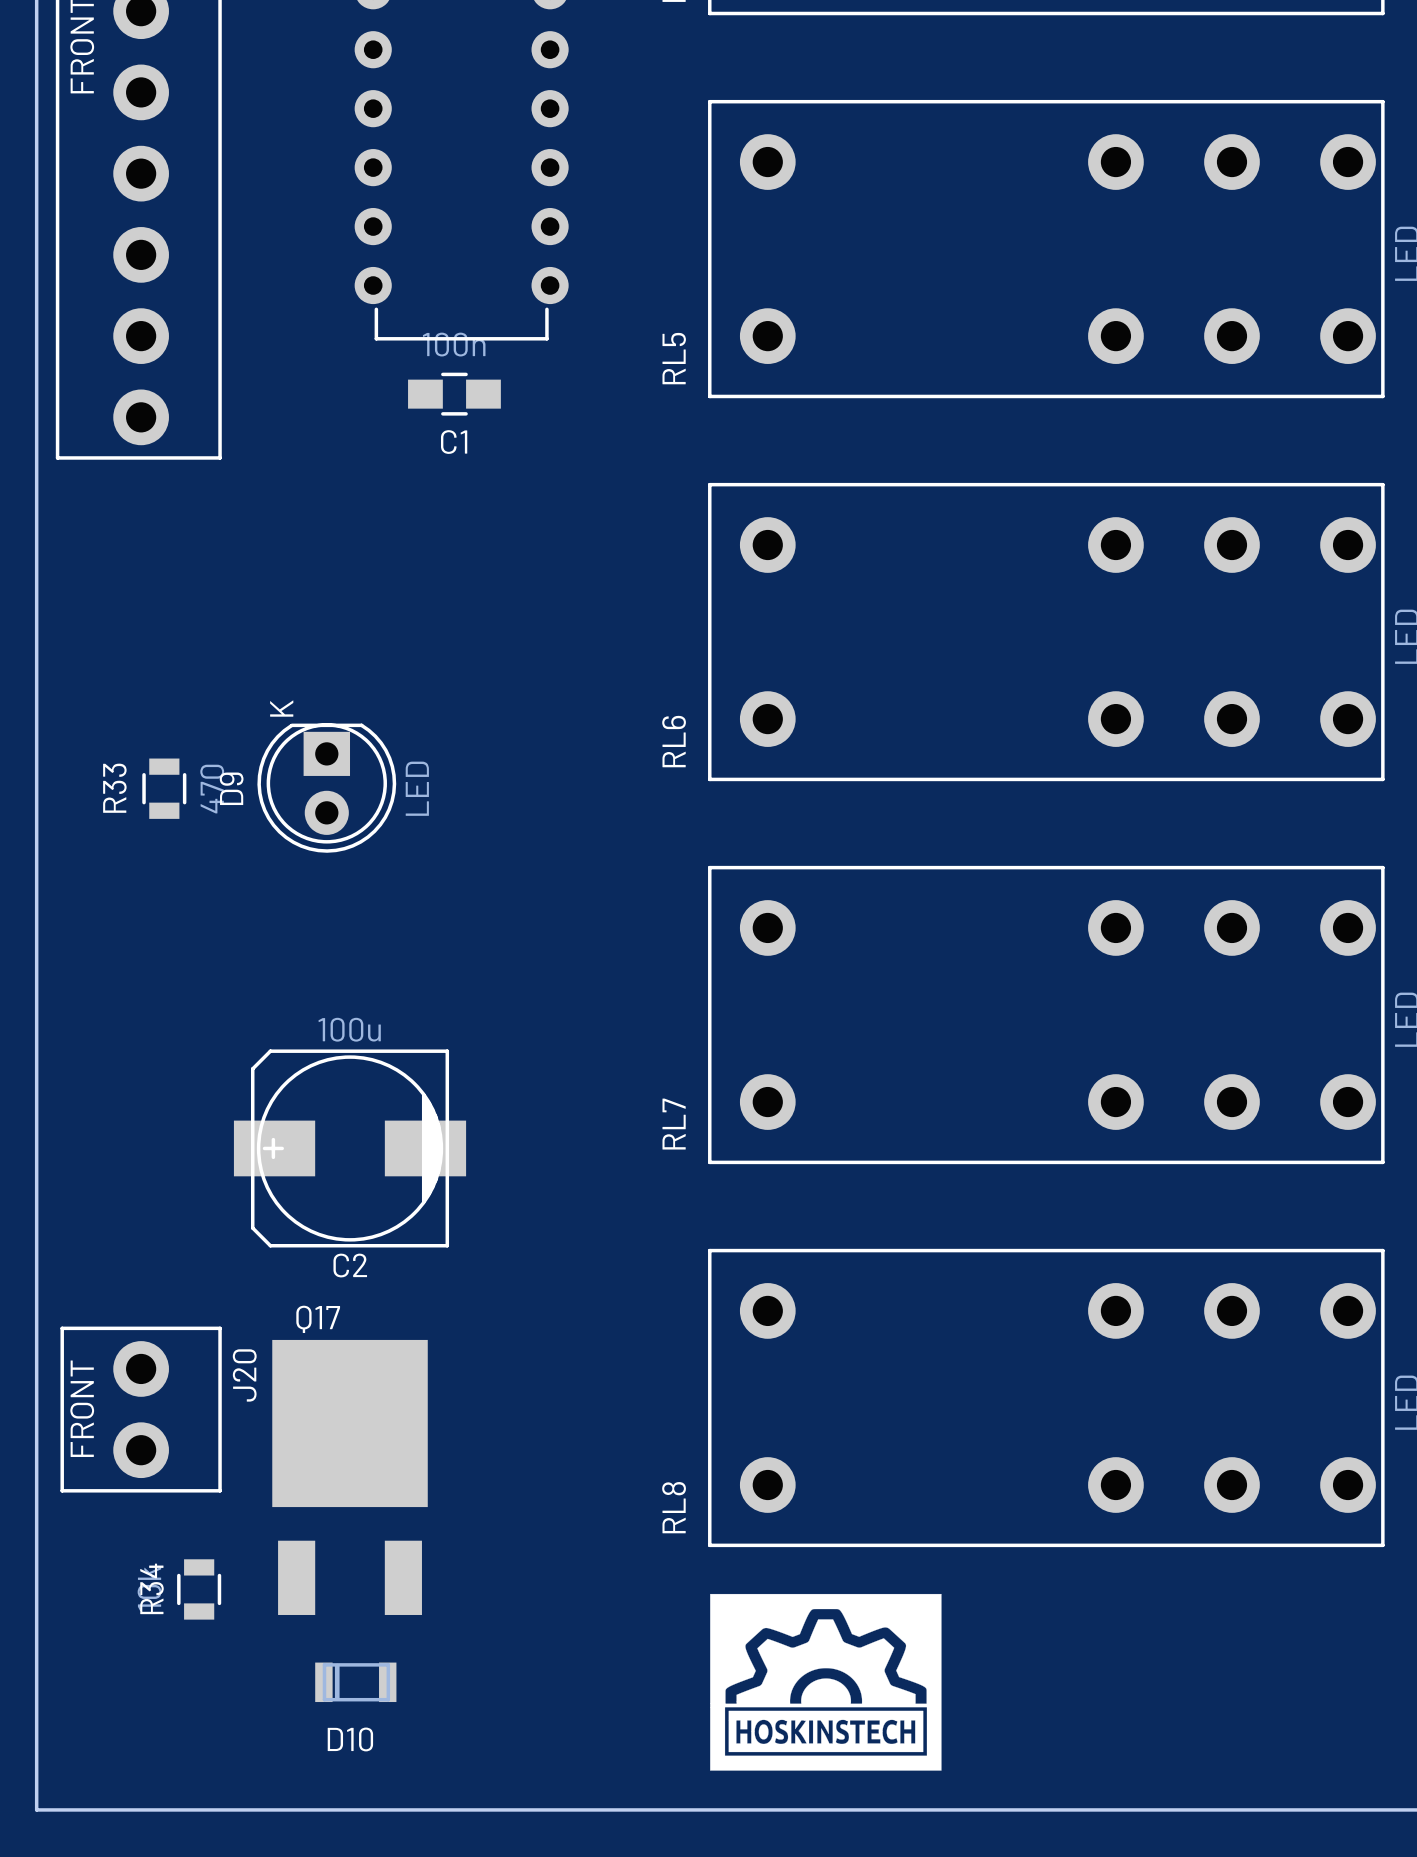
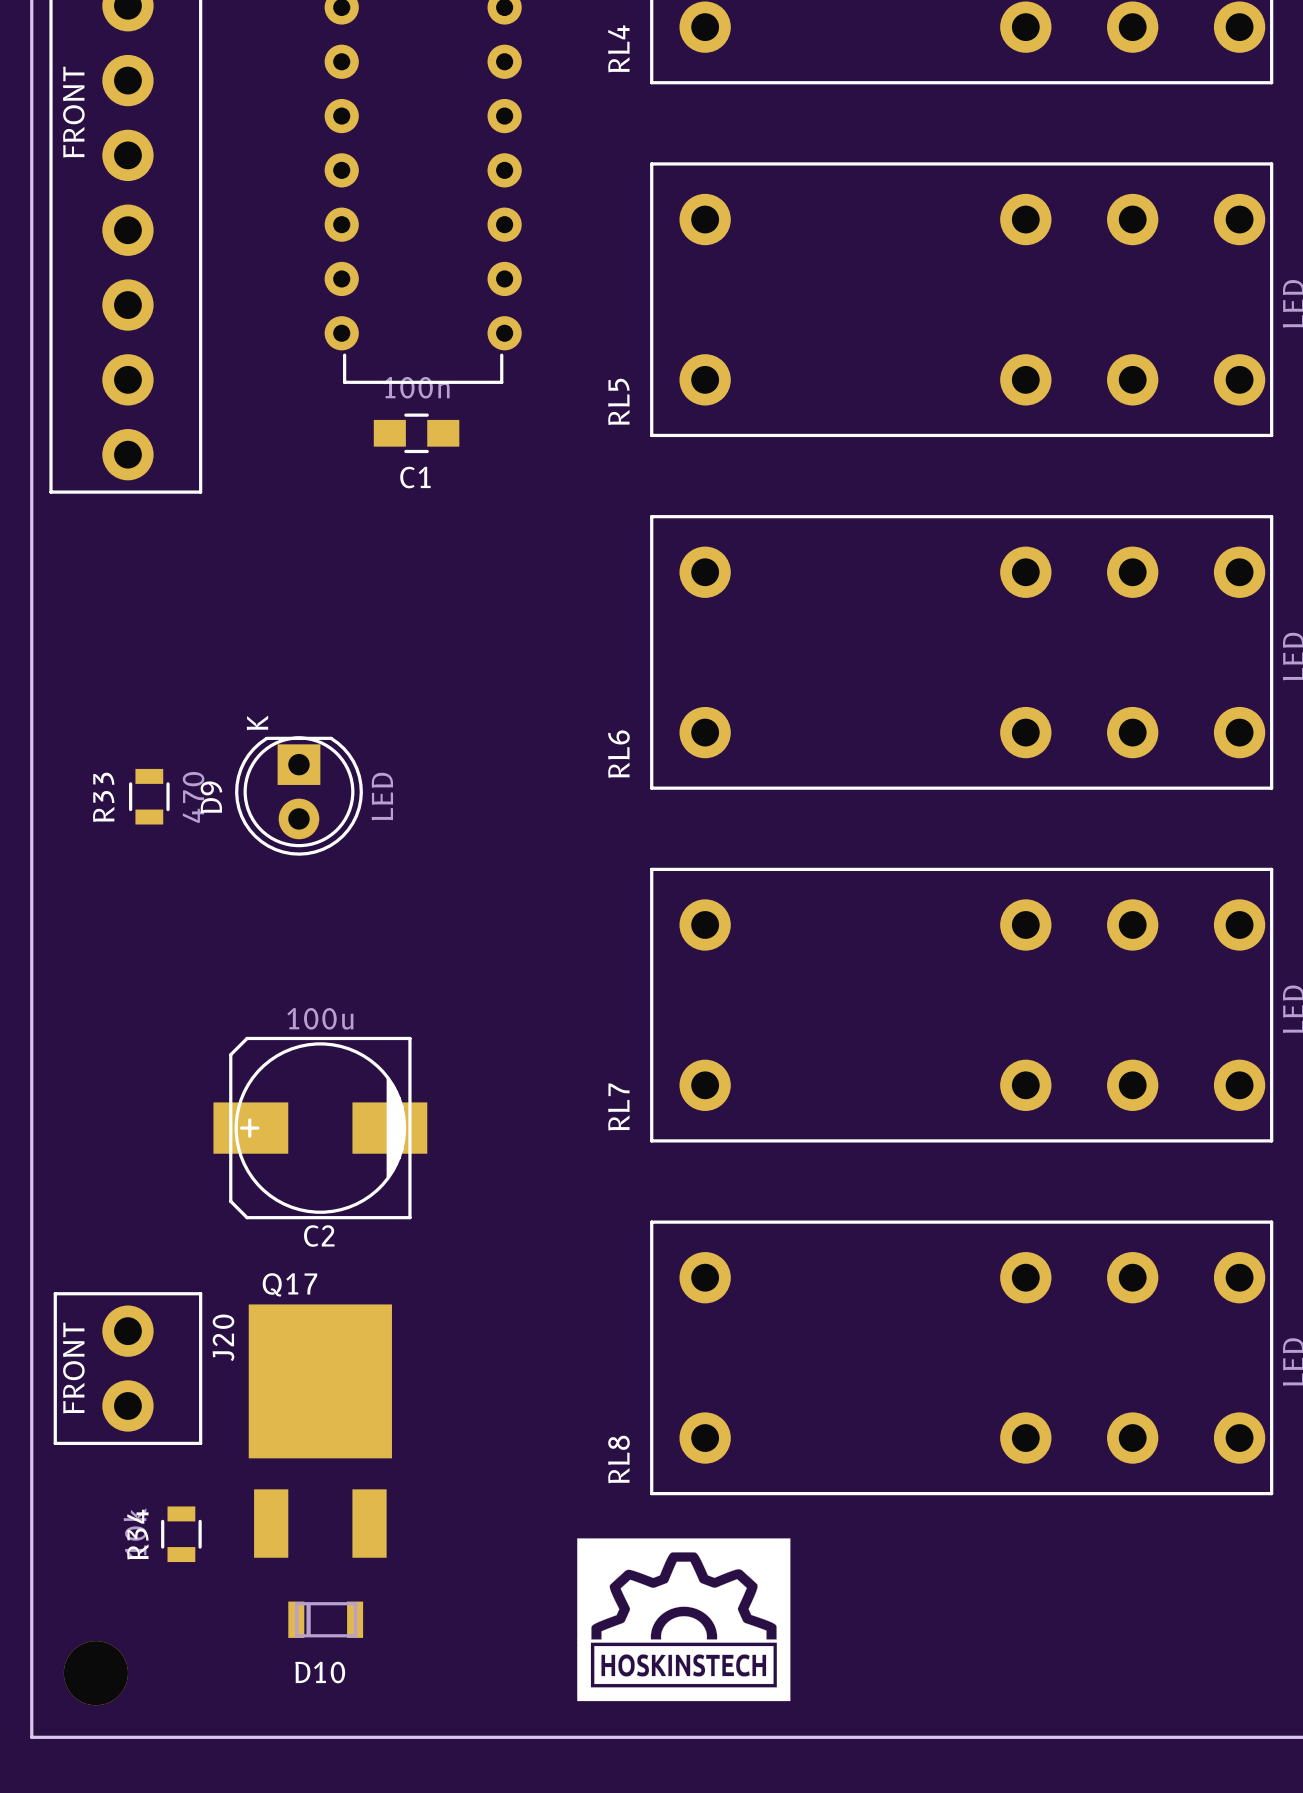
drawing position: (825, 1682) -> (683, 1619)
part: none -> (95, 1673)

